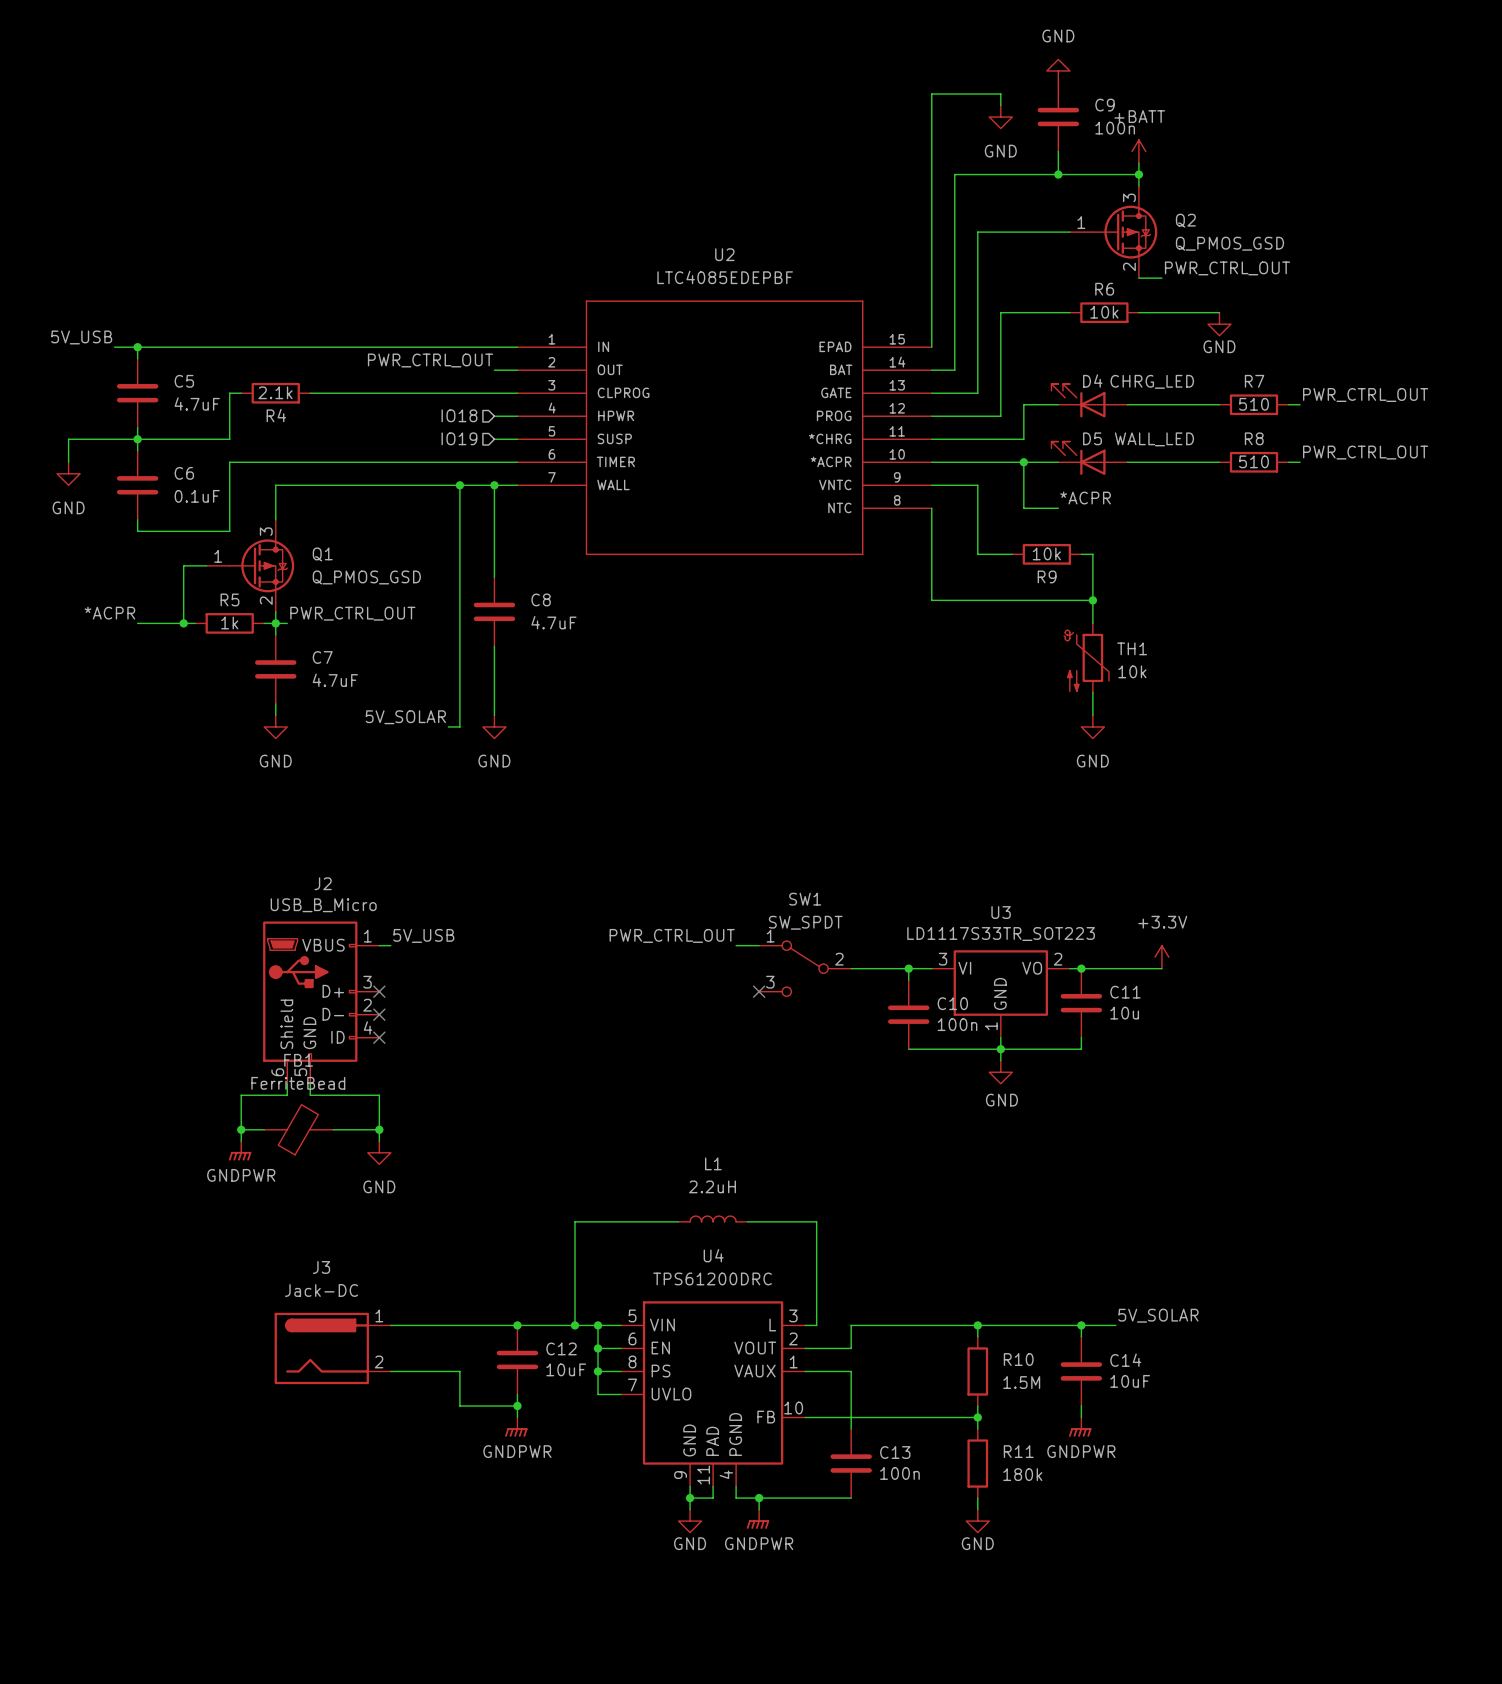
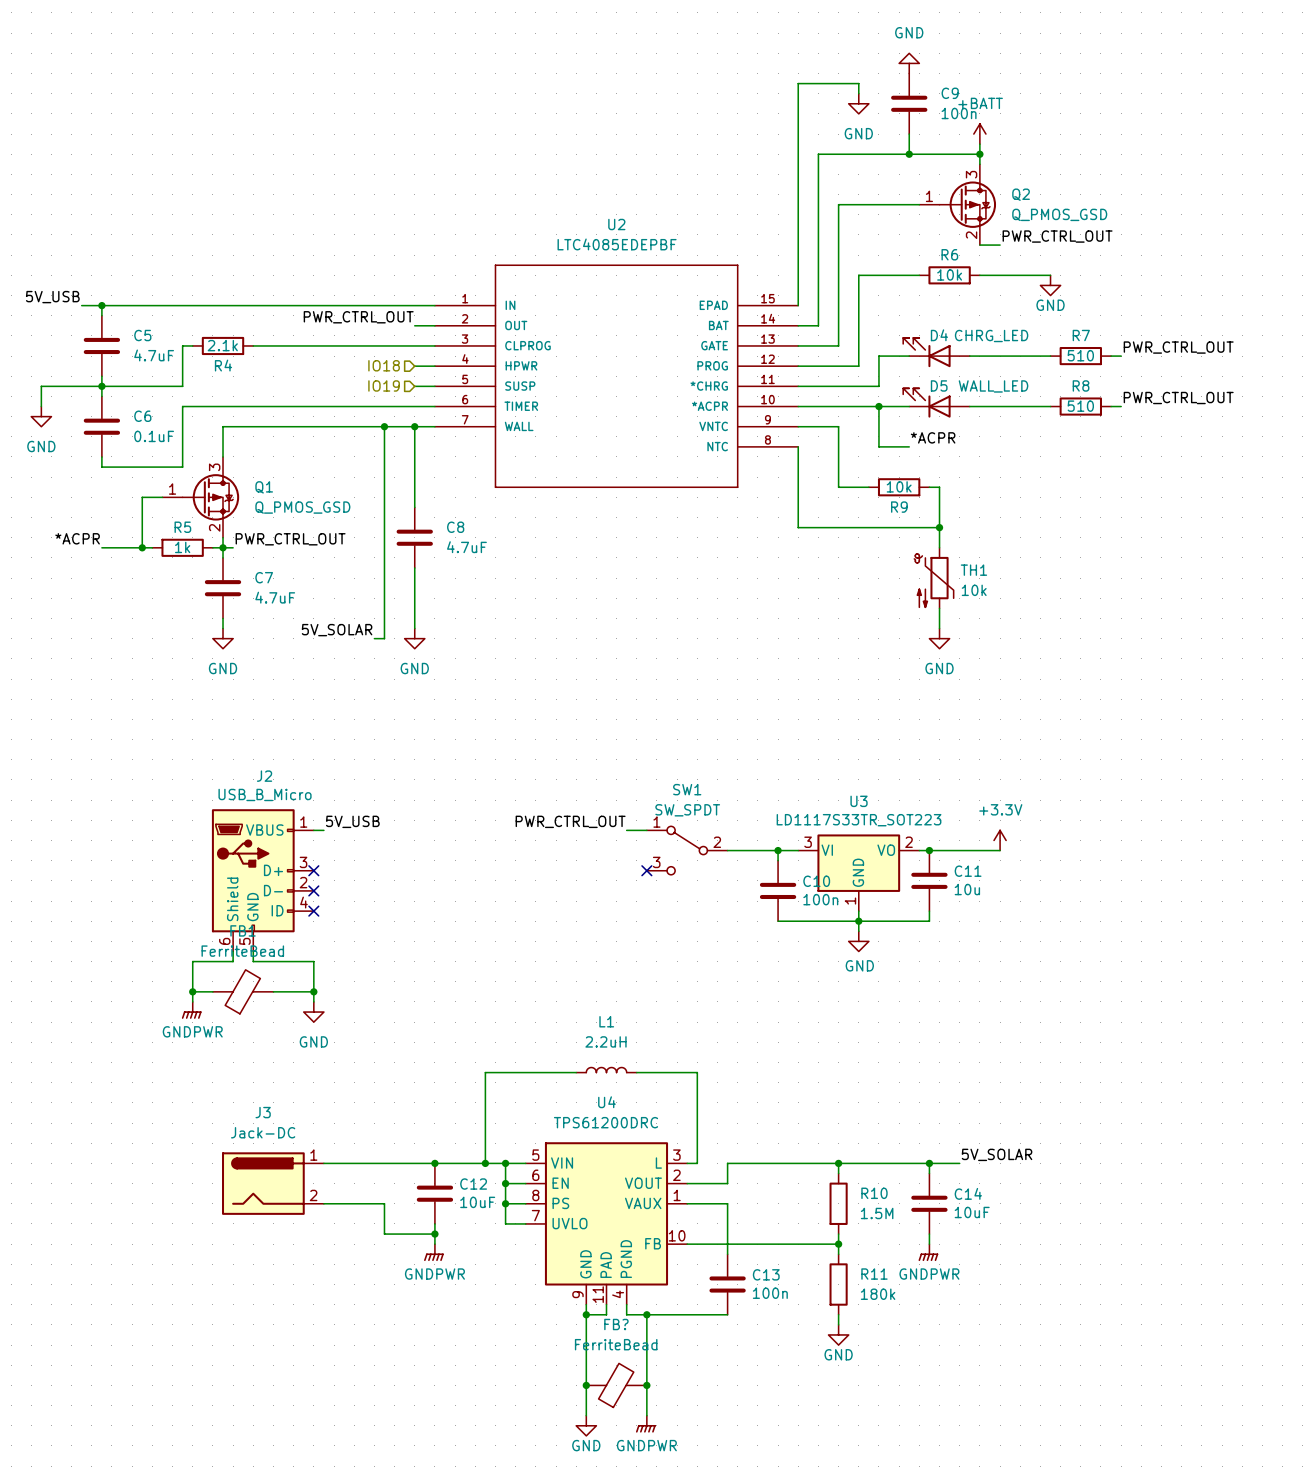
wire: none -> (586, 1324) (586, 1415)
wire: none -> (646, 1324) (646, 1415)
power symbol position: GNDPWR (757, 1519) -> GNDPWR (645, 1424)
power symbol position: GND (690, 1521) -> GND (586, 1425)
junction: none -> (586, 1385)
FB?: none -> FerriteBead (616, 1385)
junction: none -> (646, 1385)

